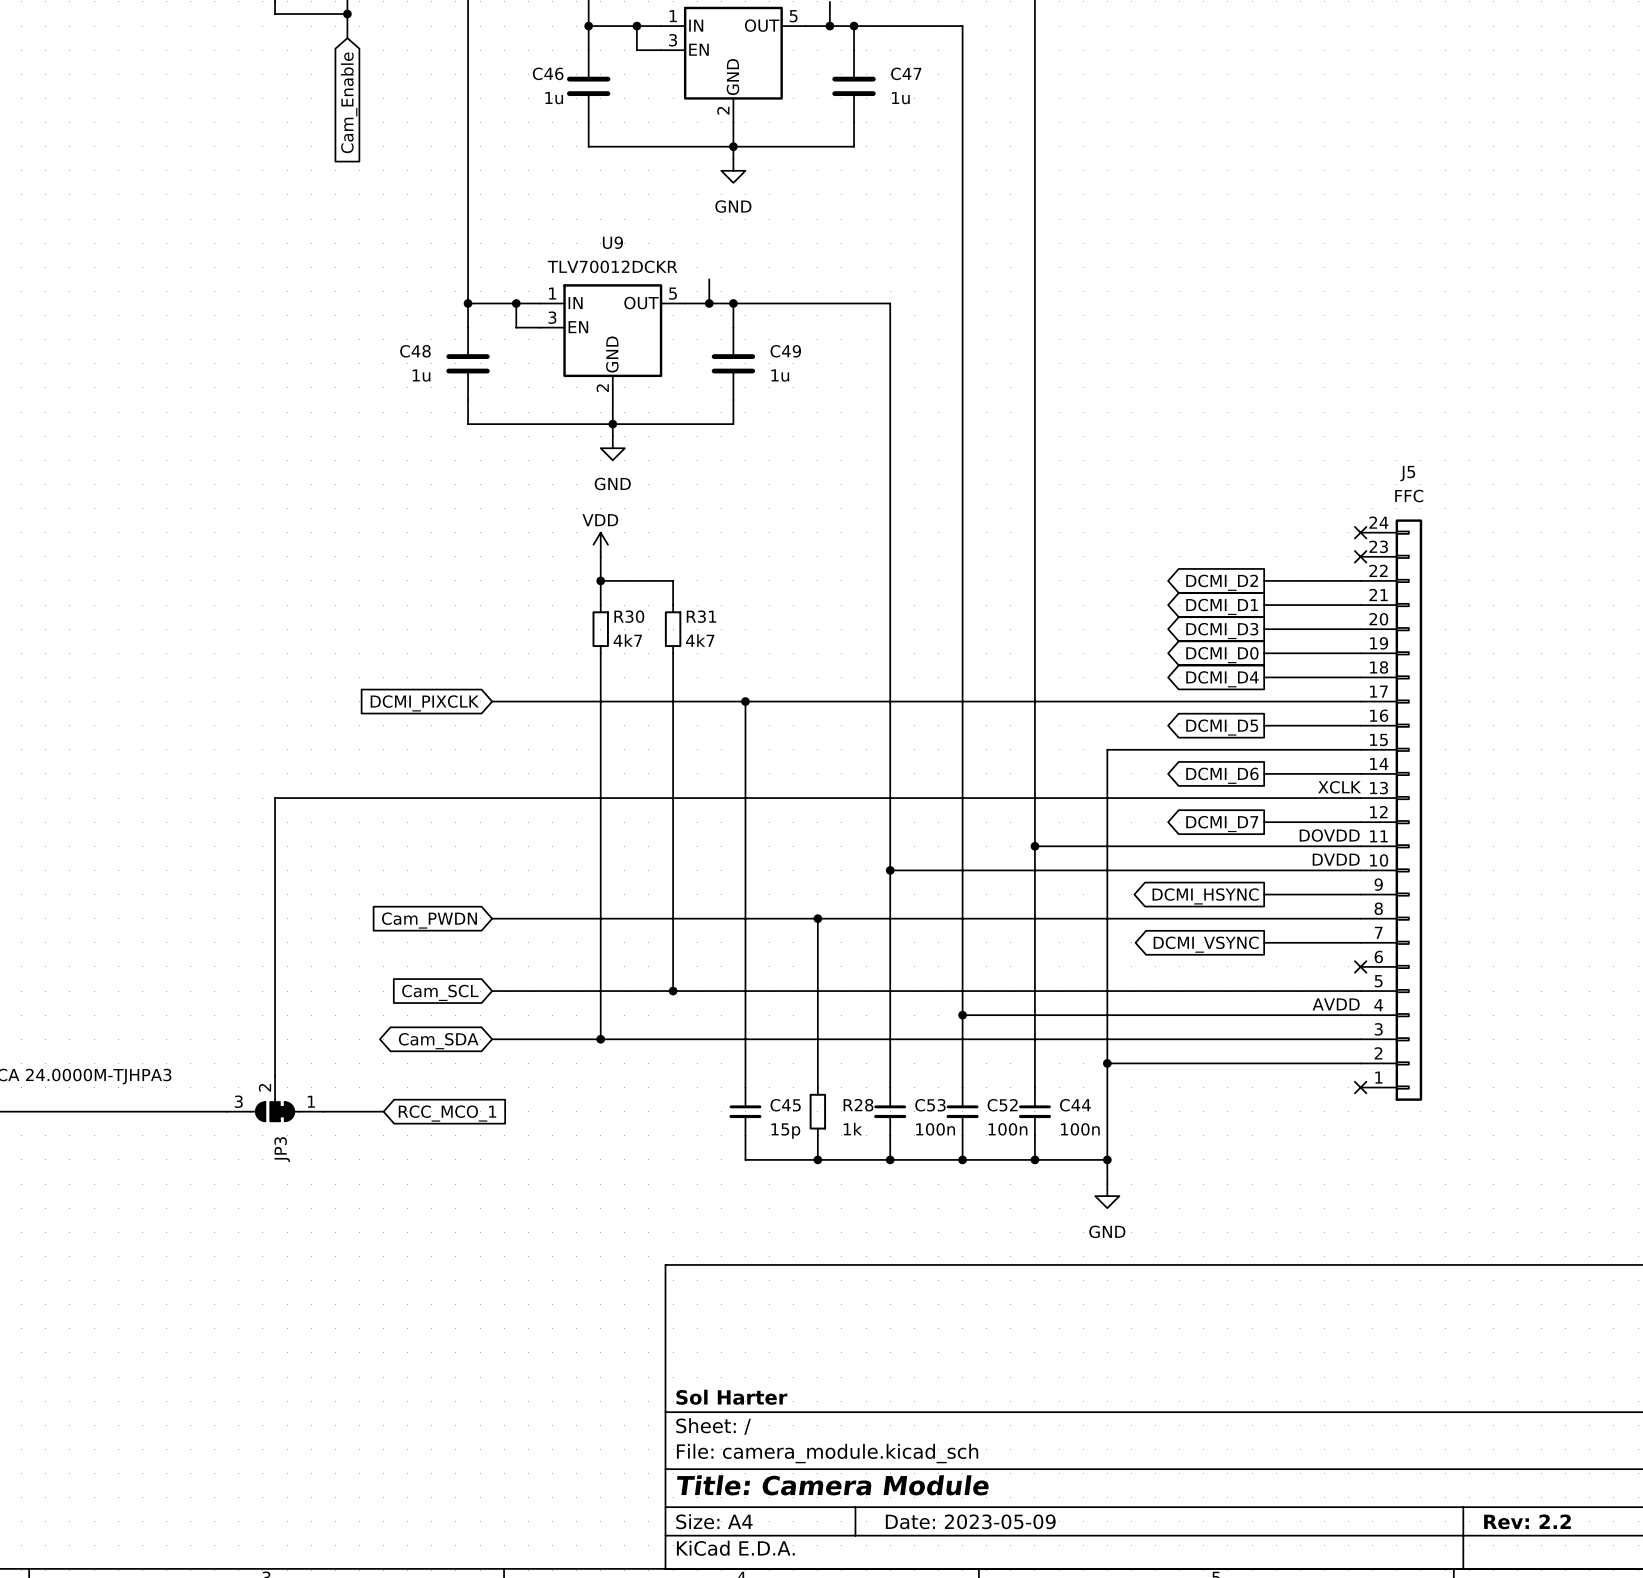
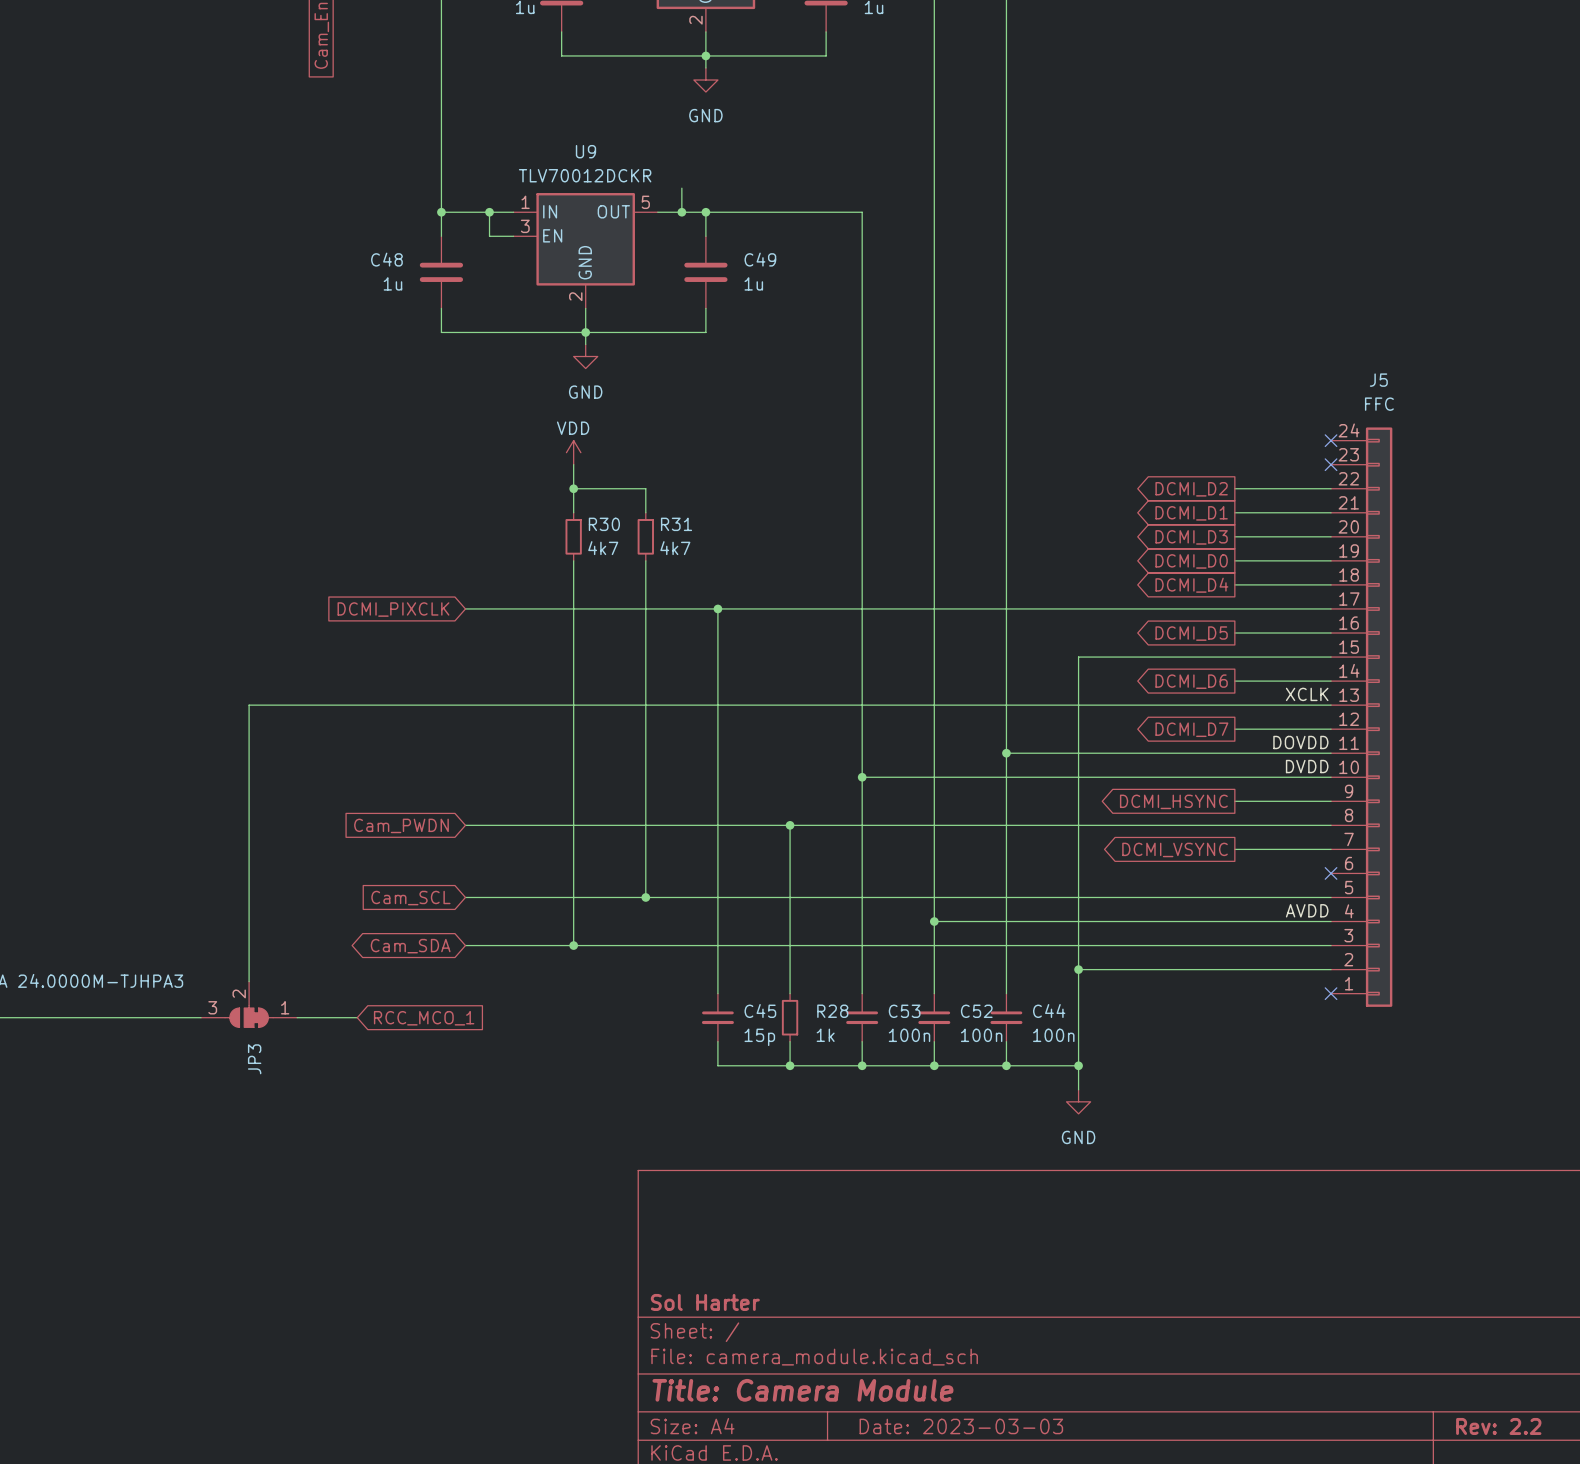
title block: Date: 2023-05-09 (970, 1521) -> Date: 2023-03-03 (961, 1426)

